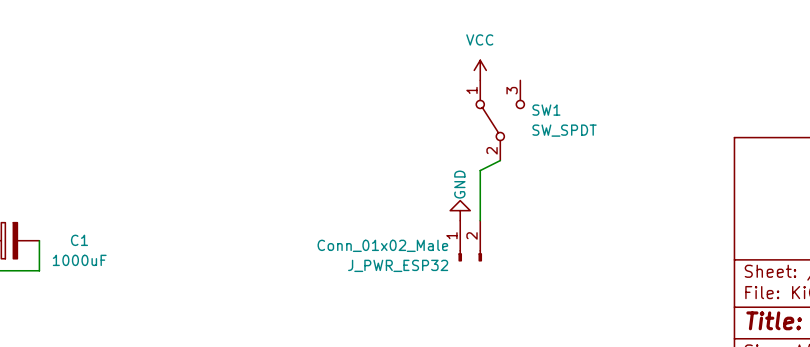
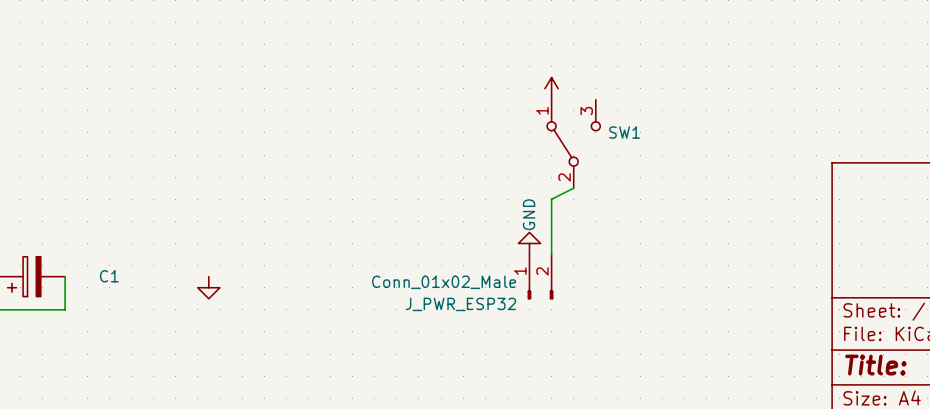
power symbol text: VCC (479, 39) -> none
SW1 value: SW_SPDT (564, 130) -> none
power symbol: none -> (208, 287)
C1 value: 1000uF (79, 260) -> none

